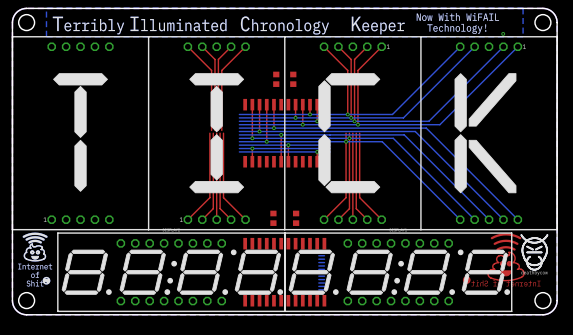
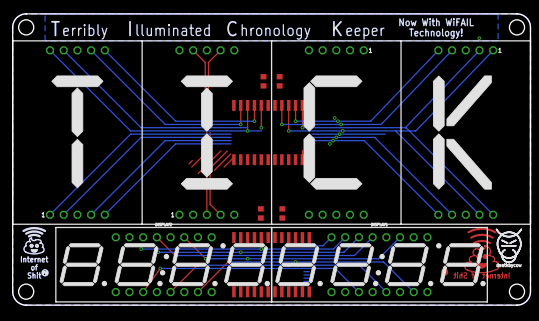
bottom track: none -> (50, 50) (130, 130) (228, 130)
bottom track: none -> (63, 50) (141, 127) (228, 127)
bottom track: none -> (91, 50) (165, 124) (228, 124)
bottom track: none -> (104, 50) (175, 121) (228, 121)
top track: (187, 46) (211, 70) (211, 130) -> none
top track: (245, 46) (221, 70) (221, 130) -> none
top track: (324, 46) (347, 70) (347, 114) -> none
top track: (338, 46) (351, 59) (351, 117) -> none
top track: (367, 46) (354, 59) (354, 121) -> none
top track: (381, 46) (357, 70) (357, 124) -> none
bottom track: (460, 46) (392, 114) (239, 114) -> (438, 50) (370, 121)
bottom track: (474, 46) (403, 117) (239, 117) -> (452, 50) (381, 124)
bottom track: (503, 46) (428, 121) (389, 121) -> (479, 50) (405, 127)
bottom track: (517, 46) (439, 124) (400, 124) -> (493, 50) (415, 130) (395, 130)
top track: none -> (295, 114) (295, 121)
via: (309, 114) -> none
via: (347, 114) -> none
top track: none -> (281, 117) (281, 124)
via: (295, 117) -> none
top track: (266, 121) (266, 141) -> none
via: none -> (254, 121)
bottom track: (309, 121) (266, 121) -> none
via: none -> (295, 121)
top track: none -> (302, 121) (302, 127)
via: (317, 121) -> none
top track: (252, 124) (252, 138) -> none
via: none -> (240, 124)
bottom track: (295, 124) (252, 124) -> none
via: none -> (281, 124)
top track: none -> (288, 124) (288, 130)
via: (302, 124) -> none
bottom track: (317, 128) (259, 128) -> none
via: none -> (302, 127)
bottom track: (302, 131) (273, 131) -> none
via: none -> (288, 130)
via: none -> (342, 130)
top track: (209, 133) (209, 197) (187, 219) -> none
top track: (213, 133) (213, 208) (202, 219) -> none
top track: (223, 133) (223, 197) (245, 219) -> none
top track: (346, 133) (346, 197) (324, 219) -> none
top track: (349, 133) (349, 208) (338, 219) -> none
top track: (352, 133) (352, 219) -> none
top track: (356, 133) (356, 208) (367, 219) -> none
top track: (359, 133) (359, 197) (381, 219) -> none
bottom track: none -> (228, 134) (130, 134) (50, 214)
top track: (281, 134) (281, 161) -> none
via: (281, 134) -> none
bottom track: (327, 134) (242, 134) -> none
via: none -> (339, 134)
bottom track: (404, 134) (489, 219) -> none
bottom track: none -> (228, 137) (141, 137) (63, 214)
via: (252, 138) -> none
bottom track: (327, 138) (242, 138) -> none
via: (349, 138) -> none
via: none -> (336, 137)
bottom track: none -> (228, 140) (165, 140) (91, 214)
via: (266, 141) -> none
bottom track: (327, 141) (242, 141) -> none
via: (346, 141) -> none
via: none -> (333, 140)
bottom track: none -> (228, 143) (175, 143) (104, 214)
top track: (288, 145) (288, 161) -> none
via: (288, 145) -> none
bottom track: (327, 145) (242, 145) -> none
via: none -> (329, 143)
top track: (252, 148) (252, 161) -> none
via: (252, 148) -> none
bottom track: (330, 148) (239, 148) -> none
via: (317, 151) -> none
bottom track: (330, 151) (239, 151) -> none
top track: none -> (220, 150) (198, 173)
top track: none -> (227, 150) (204, 173)
top track: none -> (230, 154) (214, 170)
top track: none -> (201, 157) (191, 167)
top track: none -> (233, 157) (224, 167)
top track: none -> (192, 160) (189, 163)
top track: none -> (156, 237) (175, 255)
top track: none -> (184, 237) (205, 258)
bottom track: none -> (331, 237) (322, 245) (309, 245)
bottom track: none -> (345, 237) (333, 249) (309, 249)
bottom track: none -> (358, 237) (343, 252) (309, 252)
bottom track: none -> (372, 237) (354, 255) (309, 255)
bottom track: none -> (400, 237) (378, 258) (309, 258)
via: none -> (141, 249)
via: none -> (261, 249)
bottom track: none -> (303, 249) (141, 249)
via: none -> (158, 252)
via: none -> (240, 252)
bottom track: none -> (303, 252) (158, 252)
bottom track: none -> (303, 255) (175, 255)
via: none -> (205, 258)
via: none -> (247, 258)
bottom track: none -> (303, 258) (205, 258)
top track: none -> (228, 261) (197, 292)
via: none -> (295, 261)
bottom track: none -> (303, 261) (228, 261)
bottom track: none -> (309, 261) (383, 261) (413, 292)
top track: none -> (197, 265) (170, 292)
bottom track: none -> (303, 265) (197, 265)
bottom track: none -> (309, 265) (359, 265) (386, 292)
top track: none -> (160, 268) (143, 292)
via: none -> (160, 268)
bottom track: none -> (303, 268) (160, 268)
bottom track: none -> (309, 268) (335, 268) (358, 292)

